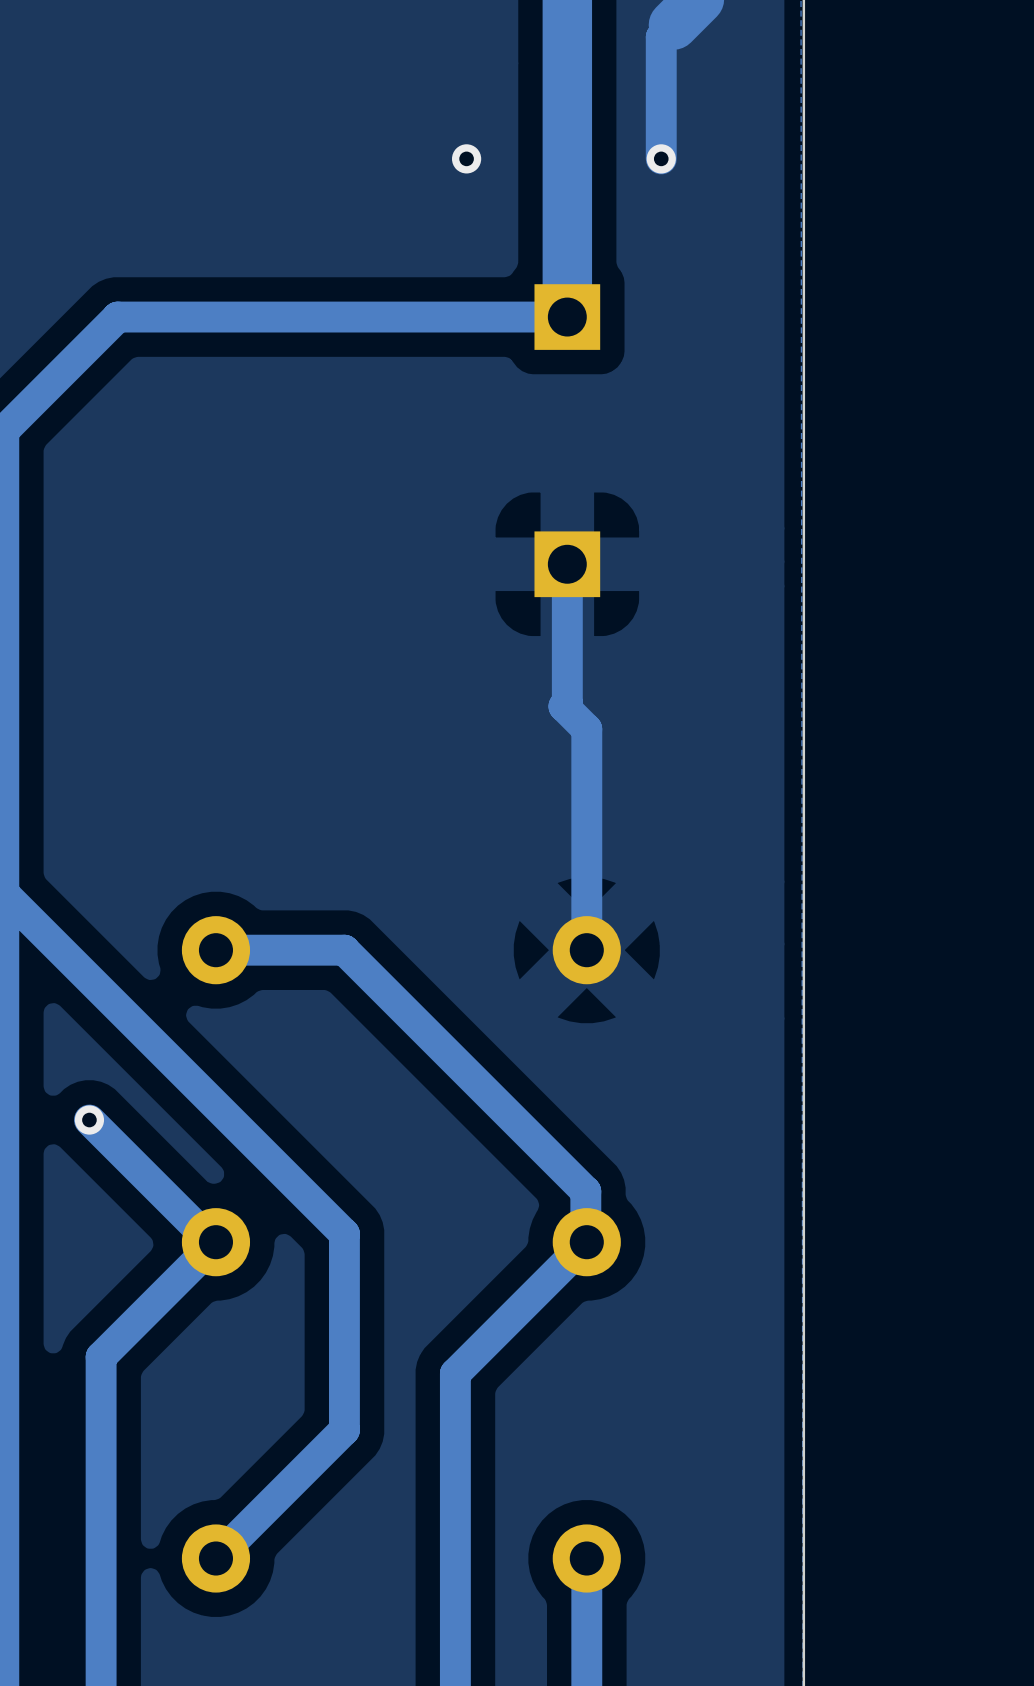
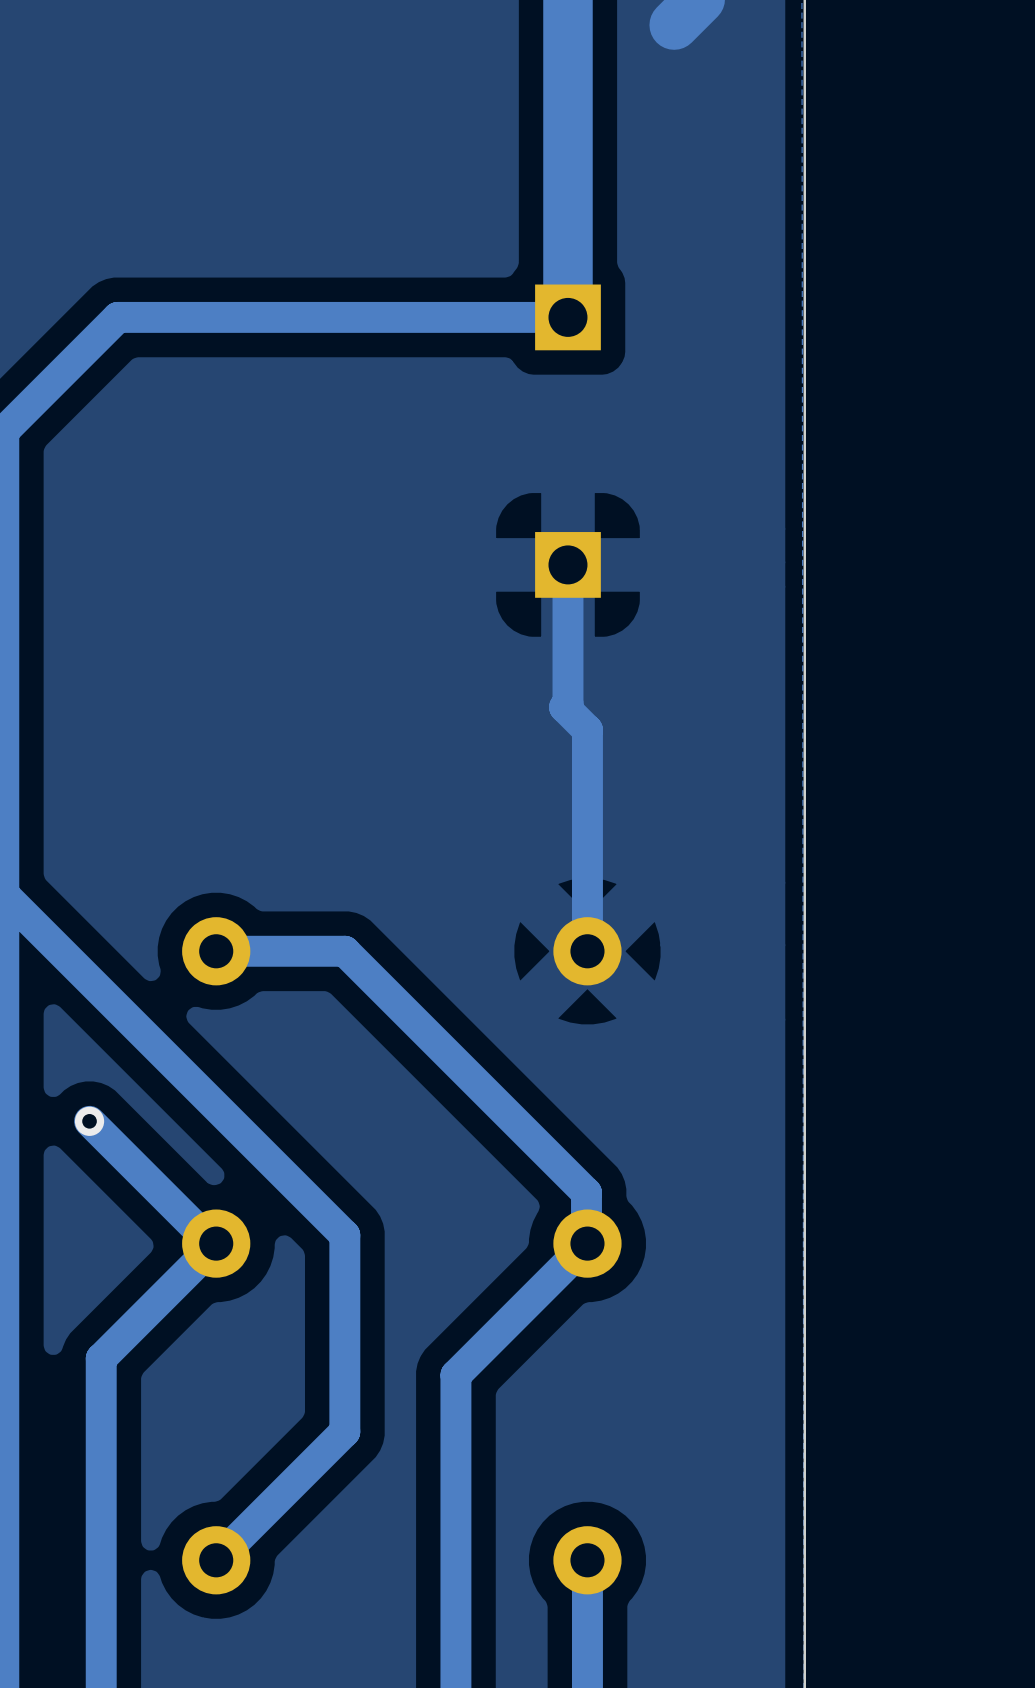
track: (673, 25) (661, 37) (661, 158) -> none
via: (466, 158) -> none
via: (661, 158) -> none

